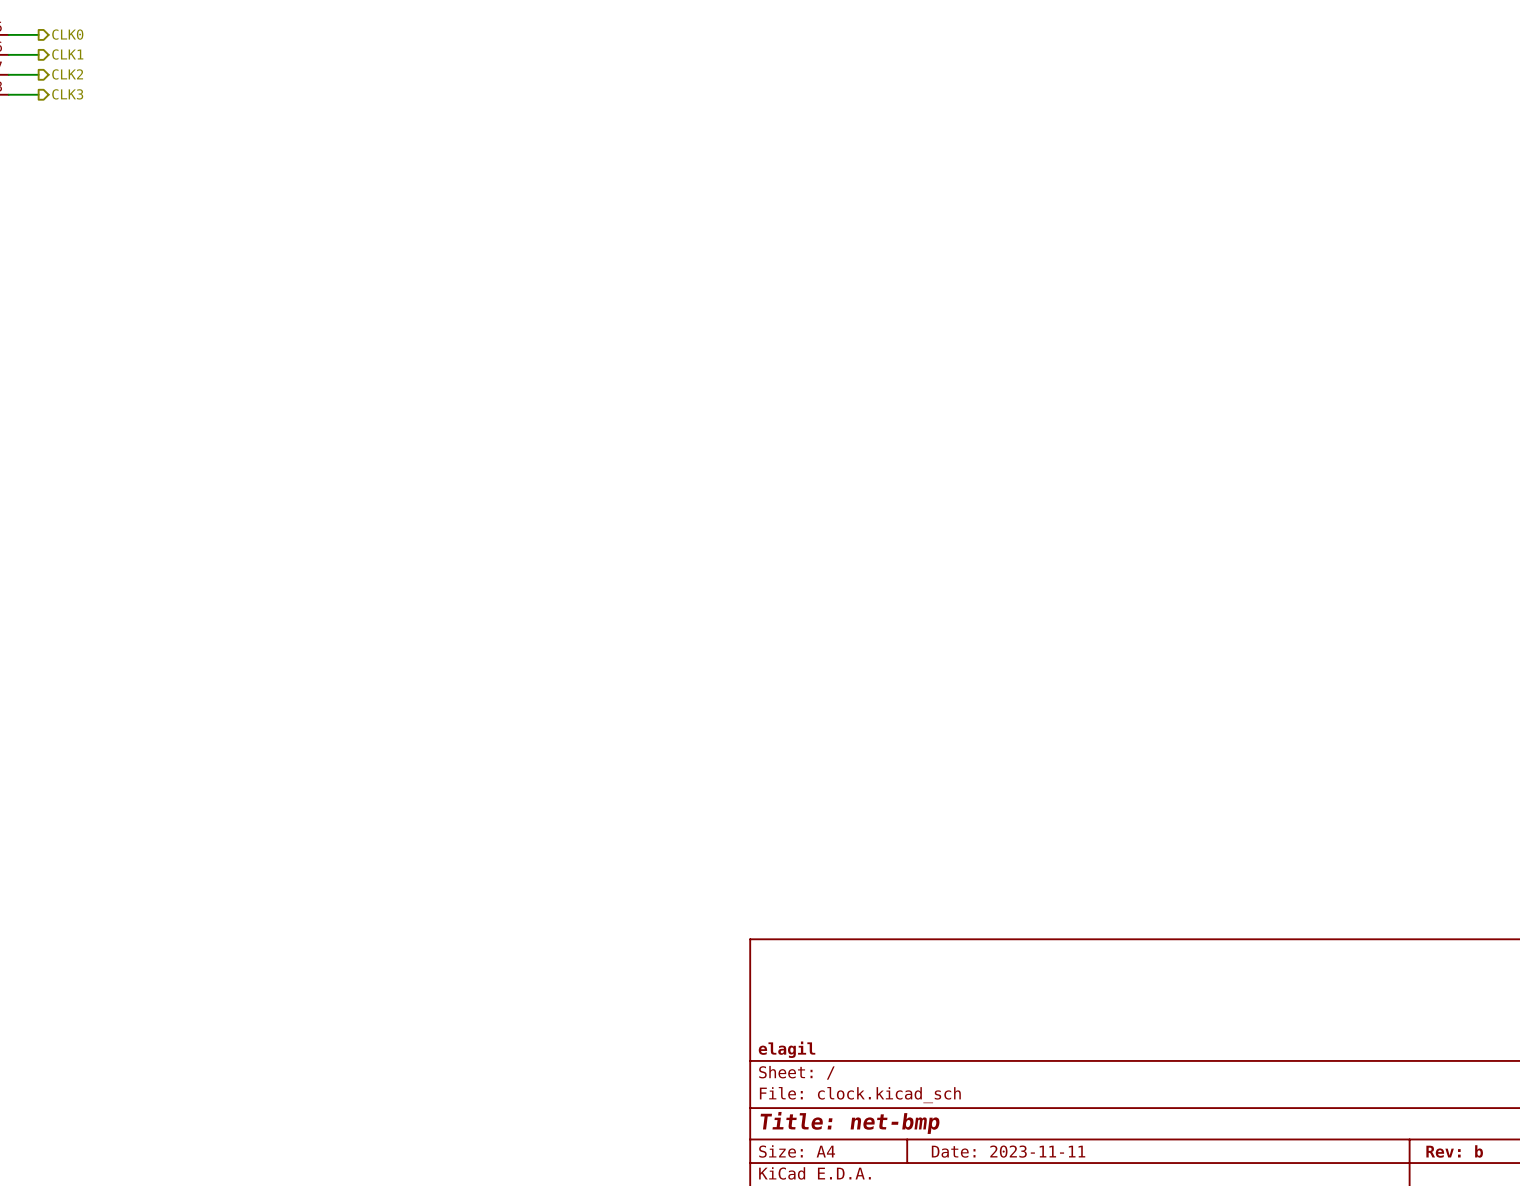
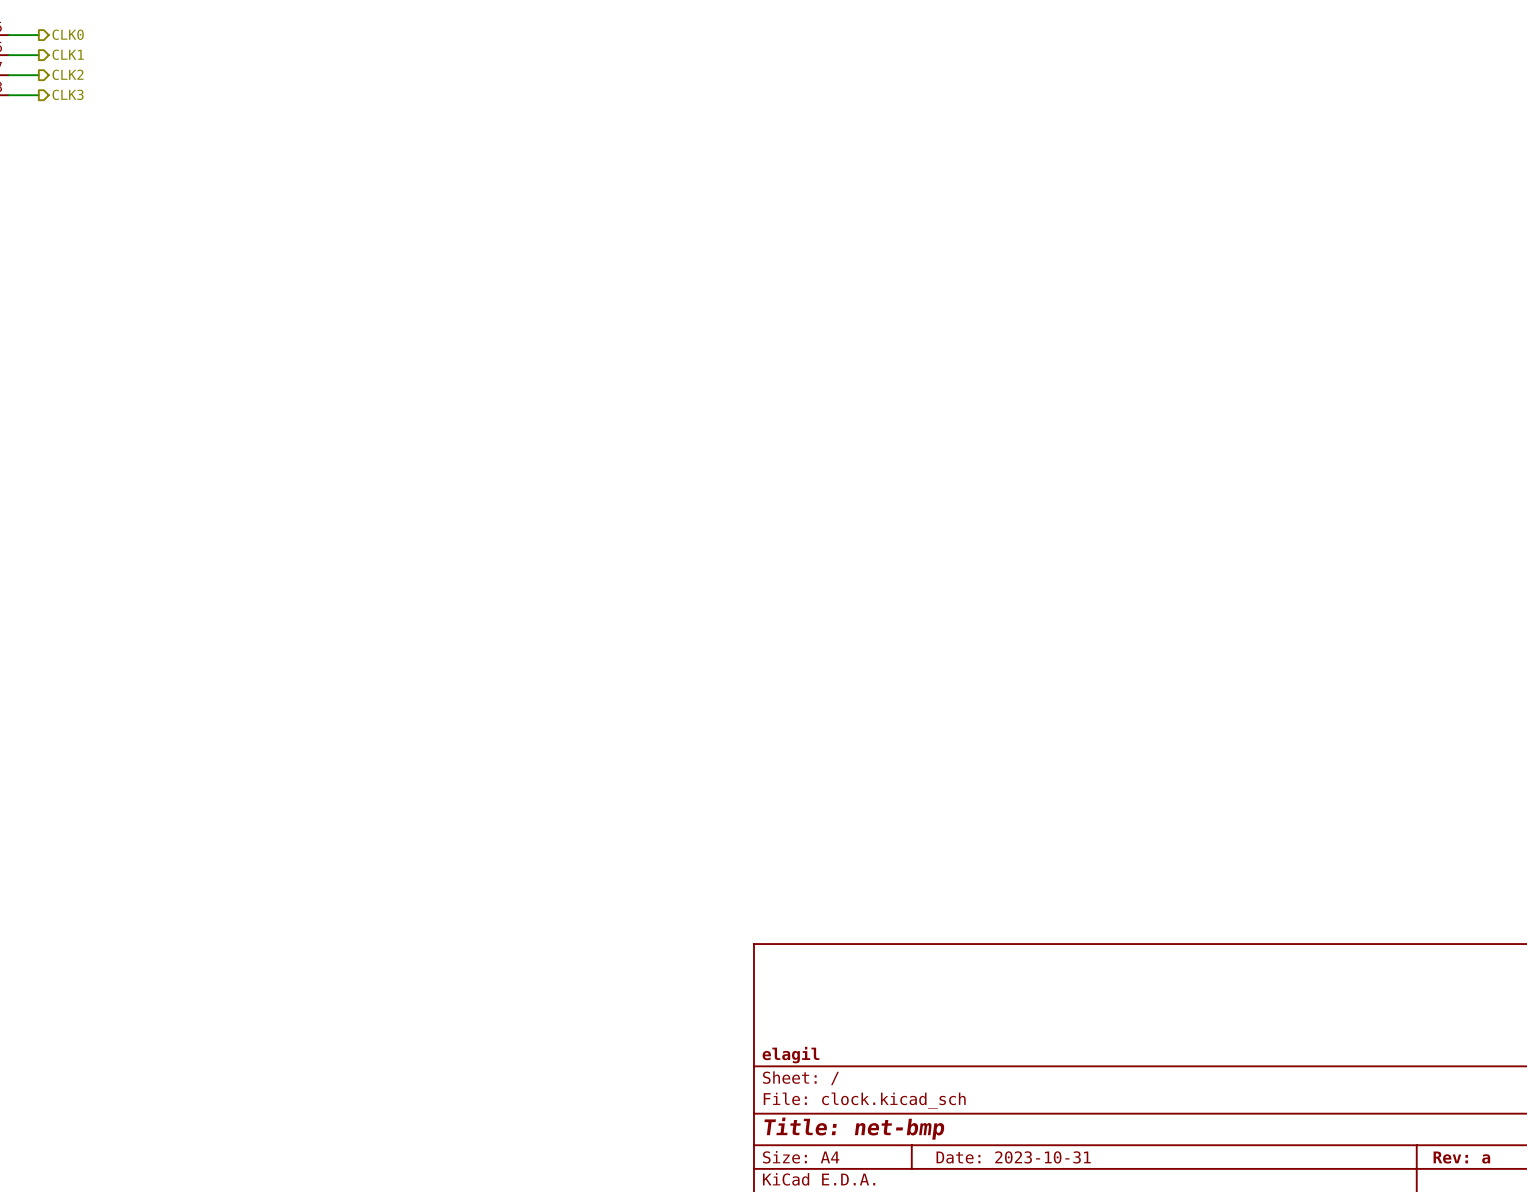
title block: Date: 2023-11-11 (1008, 1151) -> Date: 2023-10-31 (1013, 1157)
title block: Rev: b (1454, 1151) -> Rev: a (1461, 1157)

